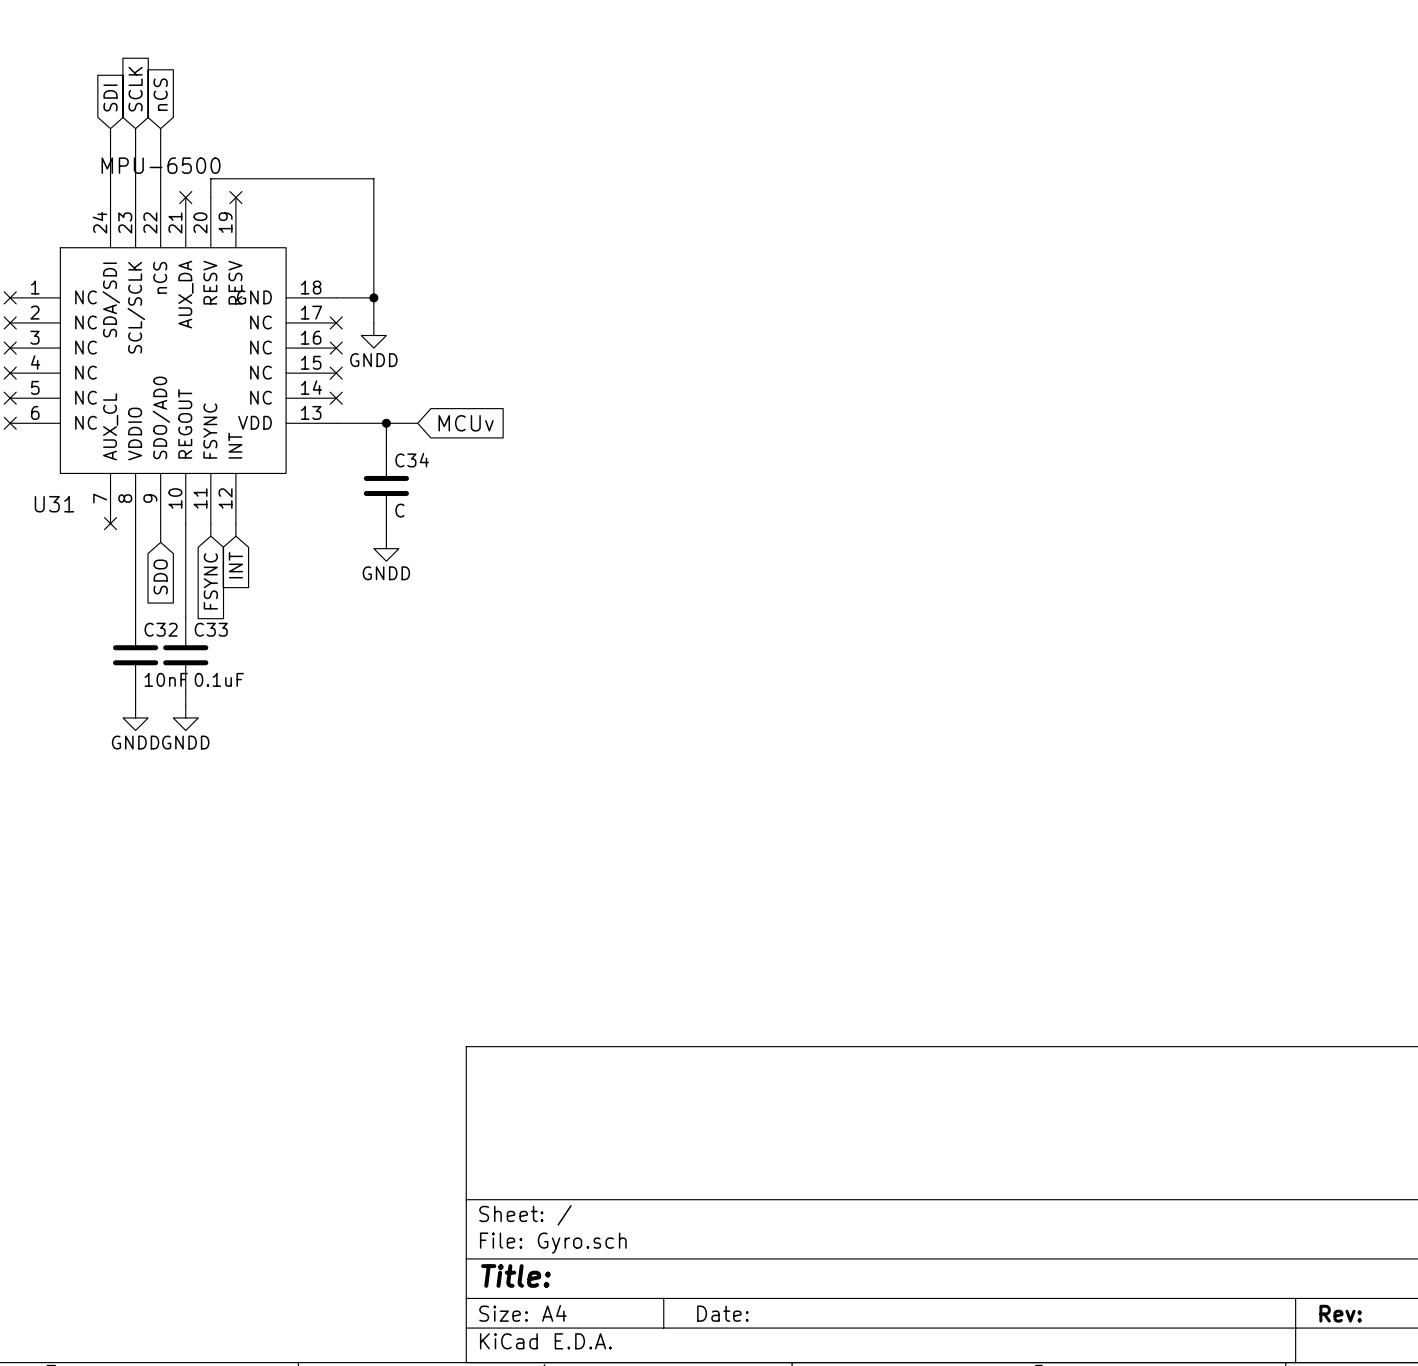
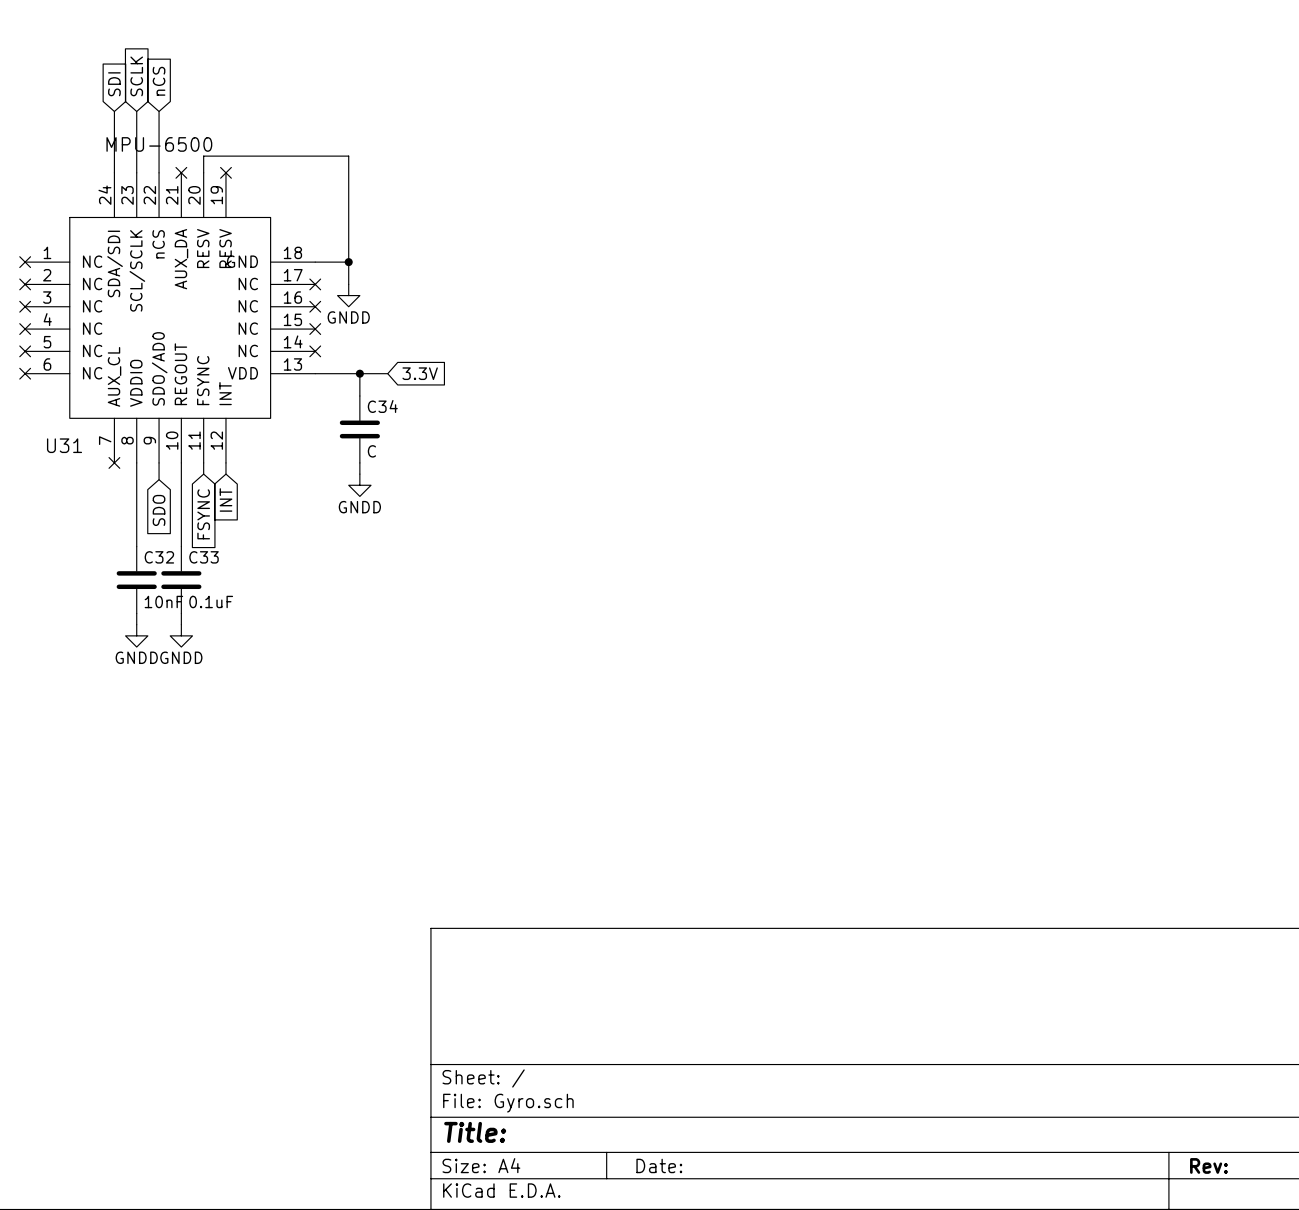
global label: MCUv (466, 423) -> 3.3V (420, 373)

